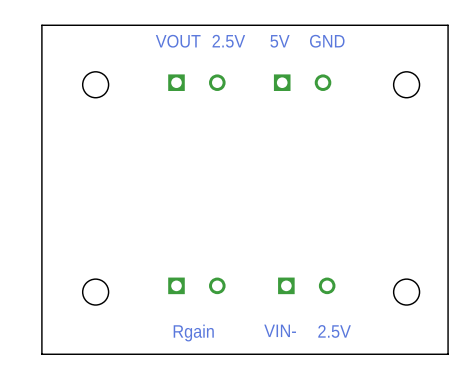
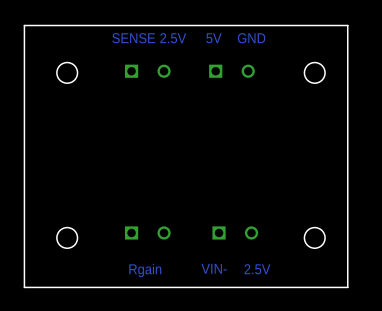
text: VOUT (178, 41) -> SENSE (133, 38)

